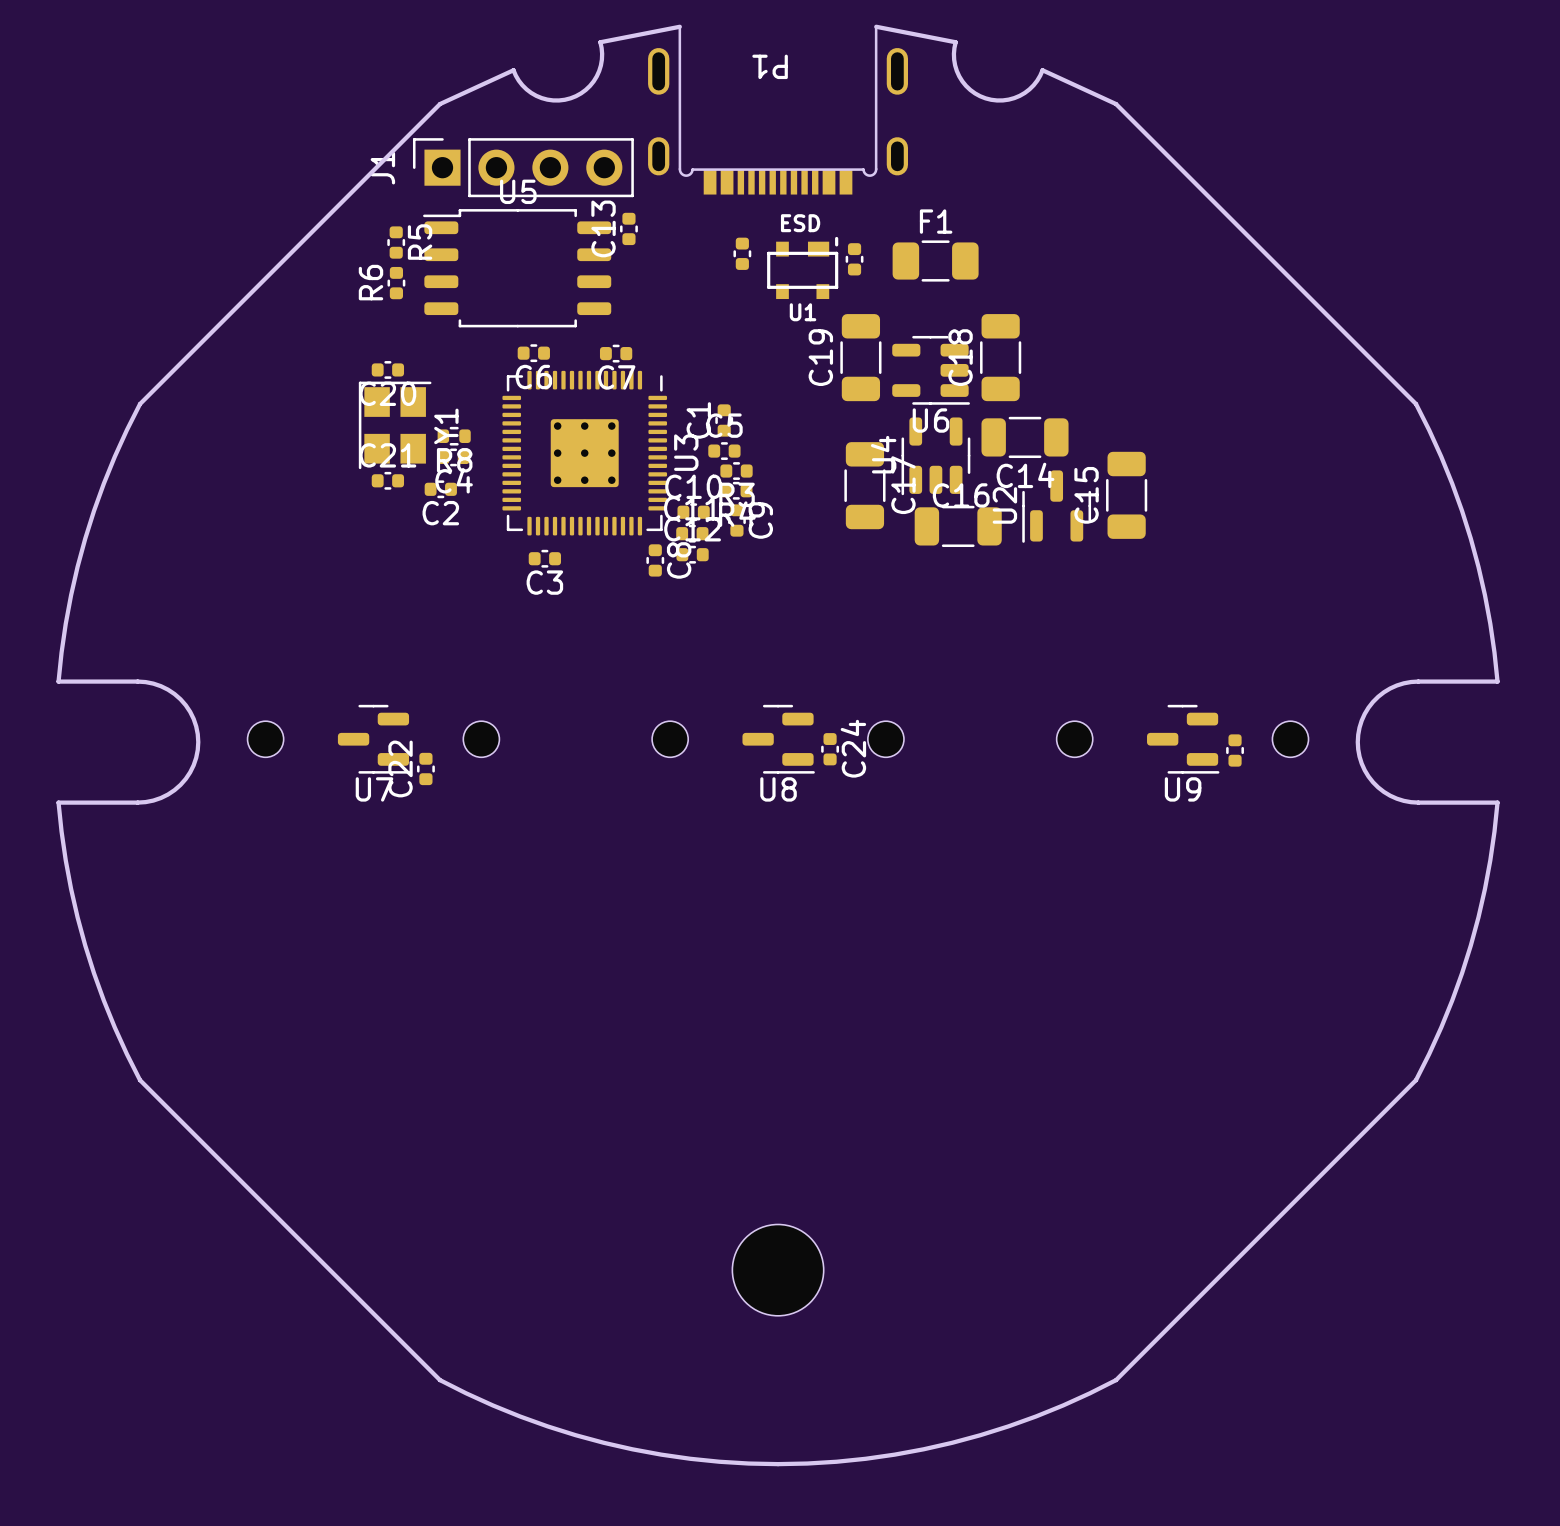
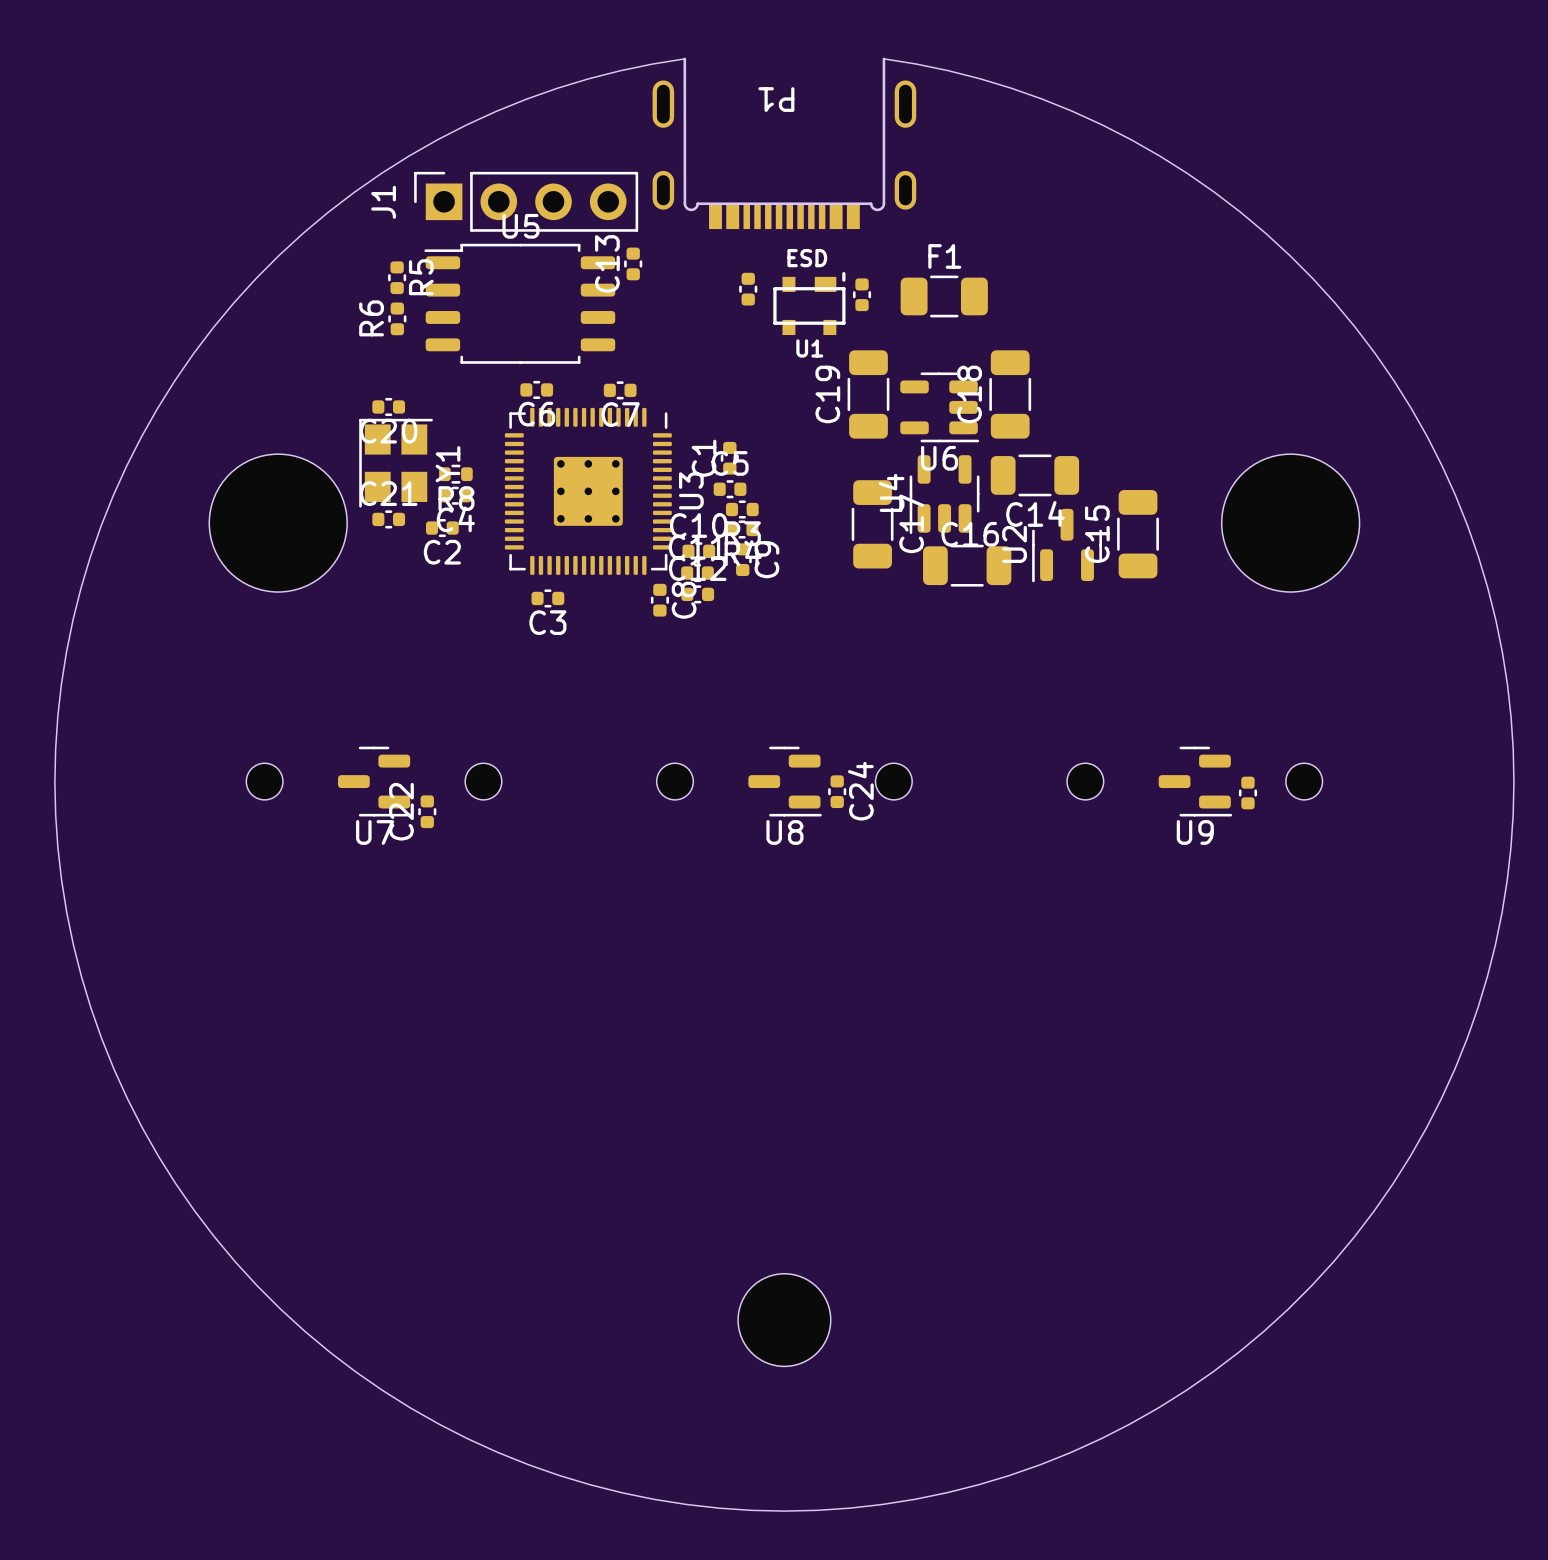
board edge: (679, 26) (600, 42) (601, 59) (596, 76) (585, 89) (570, 98) (553, 100) (536, 95) (522, 85) (513, 70) (439, 104) (140, 404) (114, 456) (85, 538) (65, 623) (58, 681) (145, 682) (168, 689) (180, 699) (193, 718) (198, 742) (196, 757) (190, 772) (180, 784) (168, 794) (153, 800) (137, 802) (58, 802) (65, 860) (85, 945) (103, 1000) (140, 1080) (439, 1380) (520, 1416) (603, 1442) (690, 1458) (778, 1464) (865, 1458) (952, 1442) (1036, 1416) (1116, 1380) (1416, 1080) (1441, 1027) (1470, 945) (1484, 889) (1497, 802) (1418, 802) (1396, 798) (1383, 791) (1373, 782) (1364, 770) (1359, 756) (1358, 734) (1364, 713) (1373, 701) (1390, 688) (1411, 682) (1497, 681) (1490, 623) (1470, 538) (1441, 456) (1416, 404) (1116, 104) (1042, 70) (1033, 85) (1019, 95) (1002, 100) (985, 98) (970, 89) (959, 76) (954, 59) (955, 42) (876, 26) -> (684, 58) (620, 70) (557, 88) (496, 111) (437, 139) (381, 173) (328, 212) (279, 255) (234, 302) (193, 353) (141, 436) (113, 495) (90, 557) (72, 620) (61, 684) (55, 749) (55, 815) (61, 880) (73, 944) (90, 1007) (113, 1068) (142, 1127) (194, 1210) (235, 1261) (280, 1309) (329, 1352) (382, 1390) (438, 1424) (497, 1452) (559, 1475) (622, 1492) (686, 1504) (784, 1511) (849, 1508) (914, 1499) (978, 1484) (1040, 1464) (1100, 1438) (1158, 1407) (1212, 1371) (1264, 1331) (1311, 1286) (1374, 1210) (1410, 1156) (1441, 1098) (1467, 1038) (1487, 976) (1502, 912) (1510, 847) (1513, 782) (1511, 717) (1502, 652) (1487, 588) (1455, 495) (1427, 436) (1393, 380) (1355, 327) (1312, 278) (1265, 233) (1214, 192) (1159, 156) (1102, 124) (1042, 99) (980, 78) (884, 58)
part: none -> (278, 523)
part: none -> (1290, 523)

